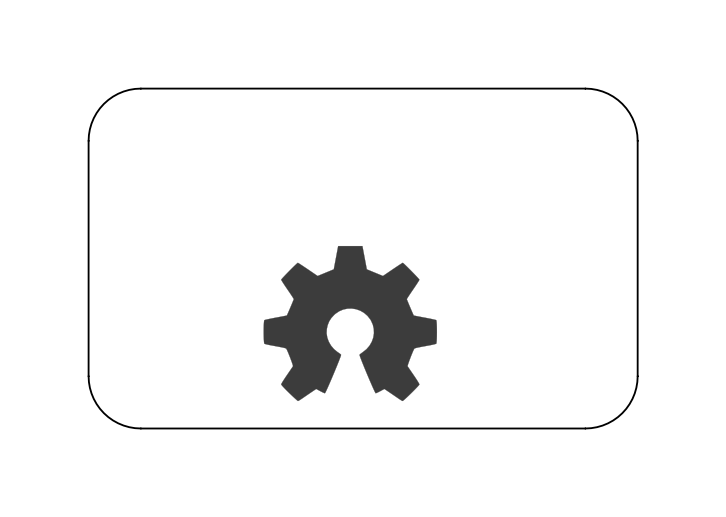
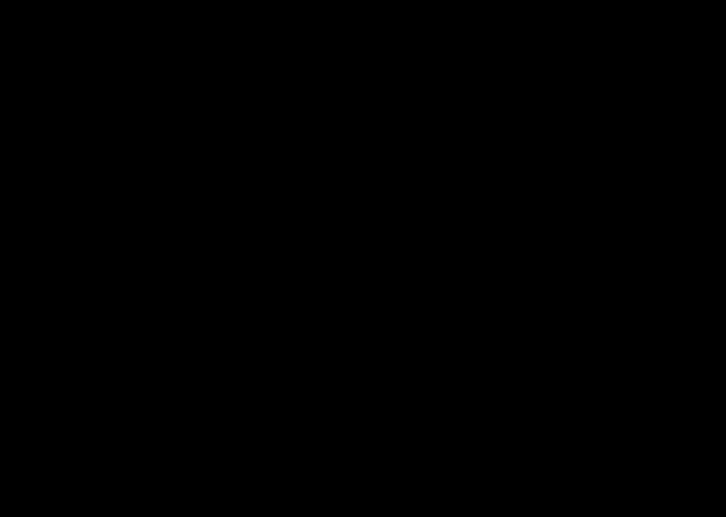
board edge: (140, 88) (585, 88) (597, 89) (613, 96) (629, 113) (634, 123) (637, 140) (637, 376) (634, 393) (629, 404) (622, 413) (608, 423) (585, 428) (140, 428) (123, 425) (113, 420) (96, 404) (88, 382) (88, 135) (93, 118) (103, 103) (118, 93) (140, 88) -> none
drawing: [263, 245, 438, 402] -> none

